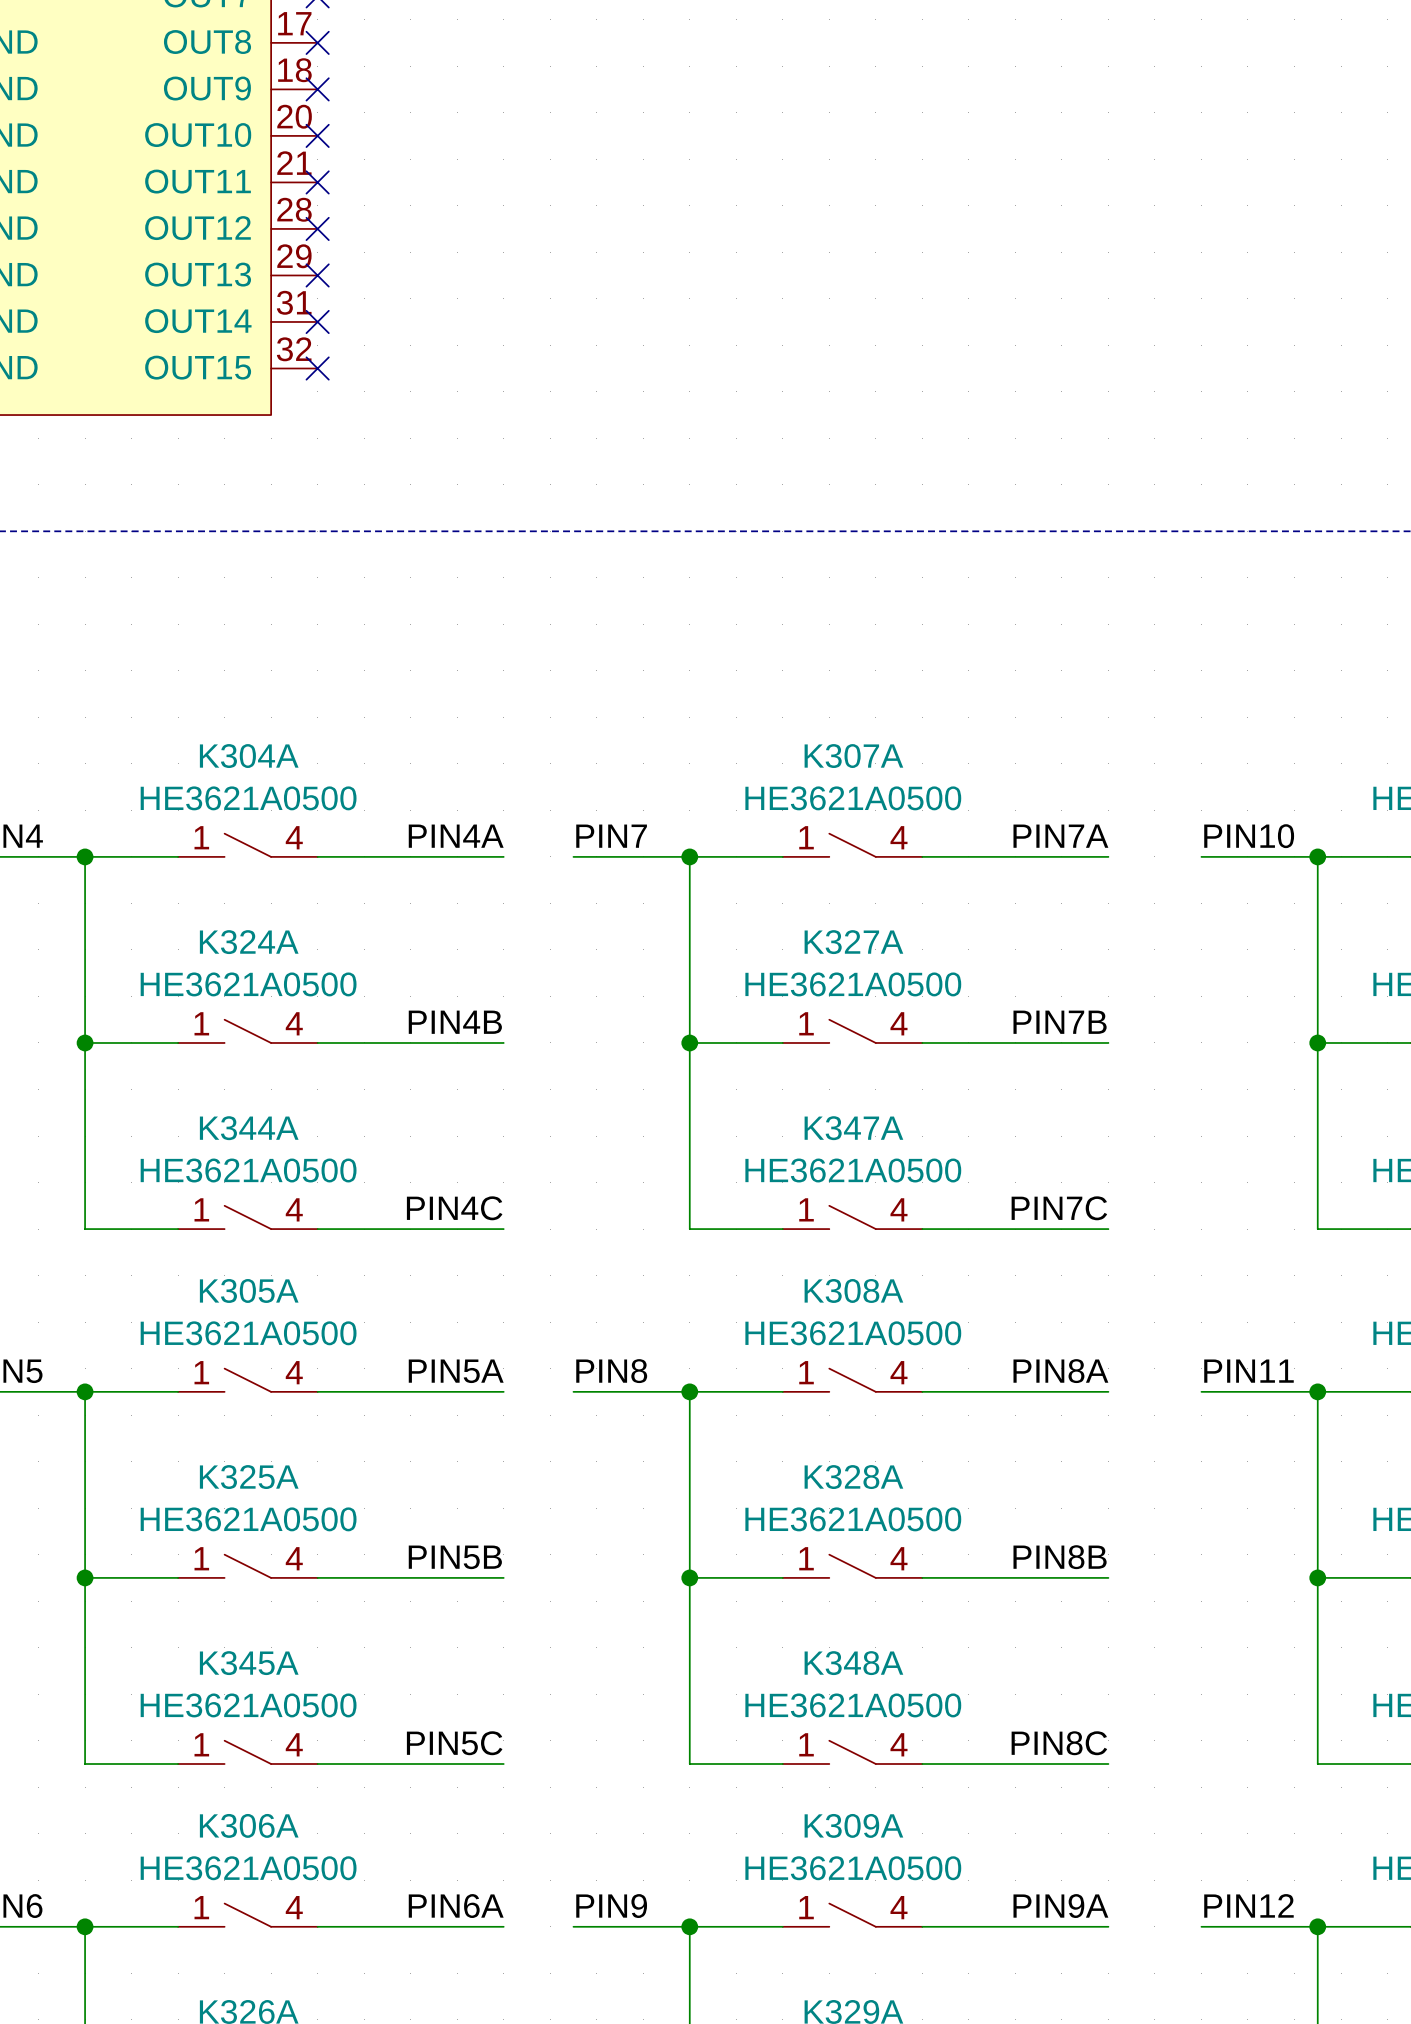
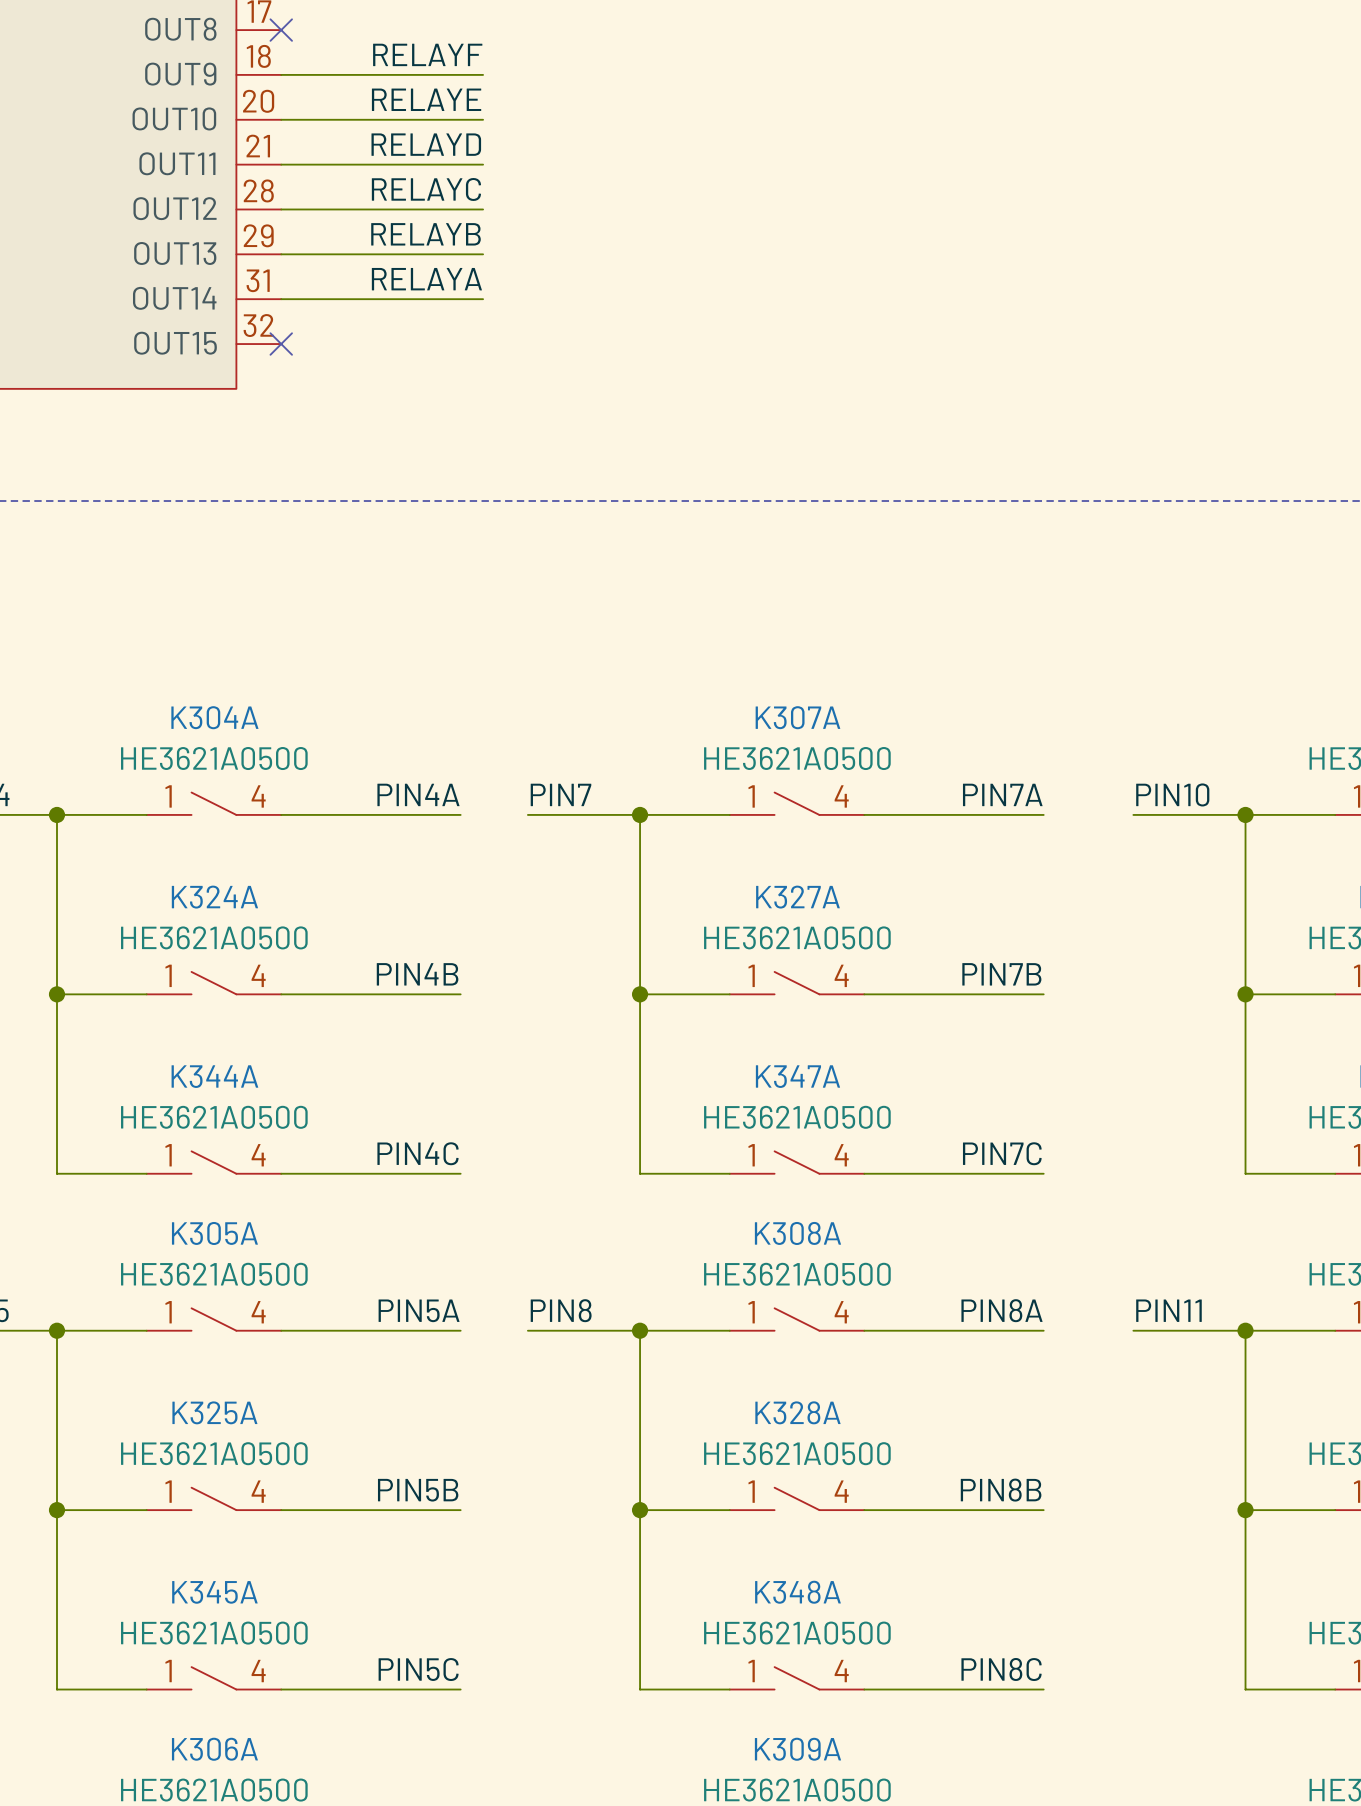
label: none -> RELAYF (427, 54)
wire: none -> (281, 74) (483, 74)
no-connect mark: (317, 89) -> none
label: none -> RELAYE (426, 99)
wire: none -> (281, 119) (483, 119)
no-connect mark: (317, 135) -> none
label: none -> RELAYD (426, 144)
wire: none -> (281, 164) (483, 164)
no-connect mark: (317, 182) -> none
label: none -> RELAYC (426, 189)
wire: none -> (281, 209) (483, 209)
no-connect mark: (317, 228) -> none
label: none -> RELAYB (425, 234)
wire: none -> (281, 254) (483, 254)
no-connect mark: (317, 275) -> none
label: none -> RELAYA (426, 279)
wire: none -> (281, 299) (483, 299)
no-connect mark: (317, 321) -> none

